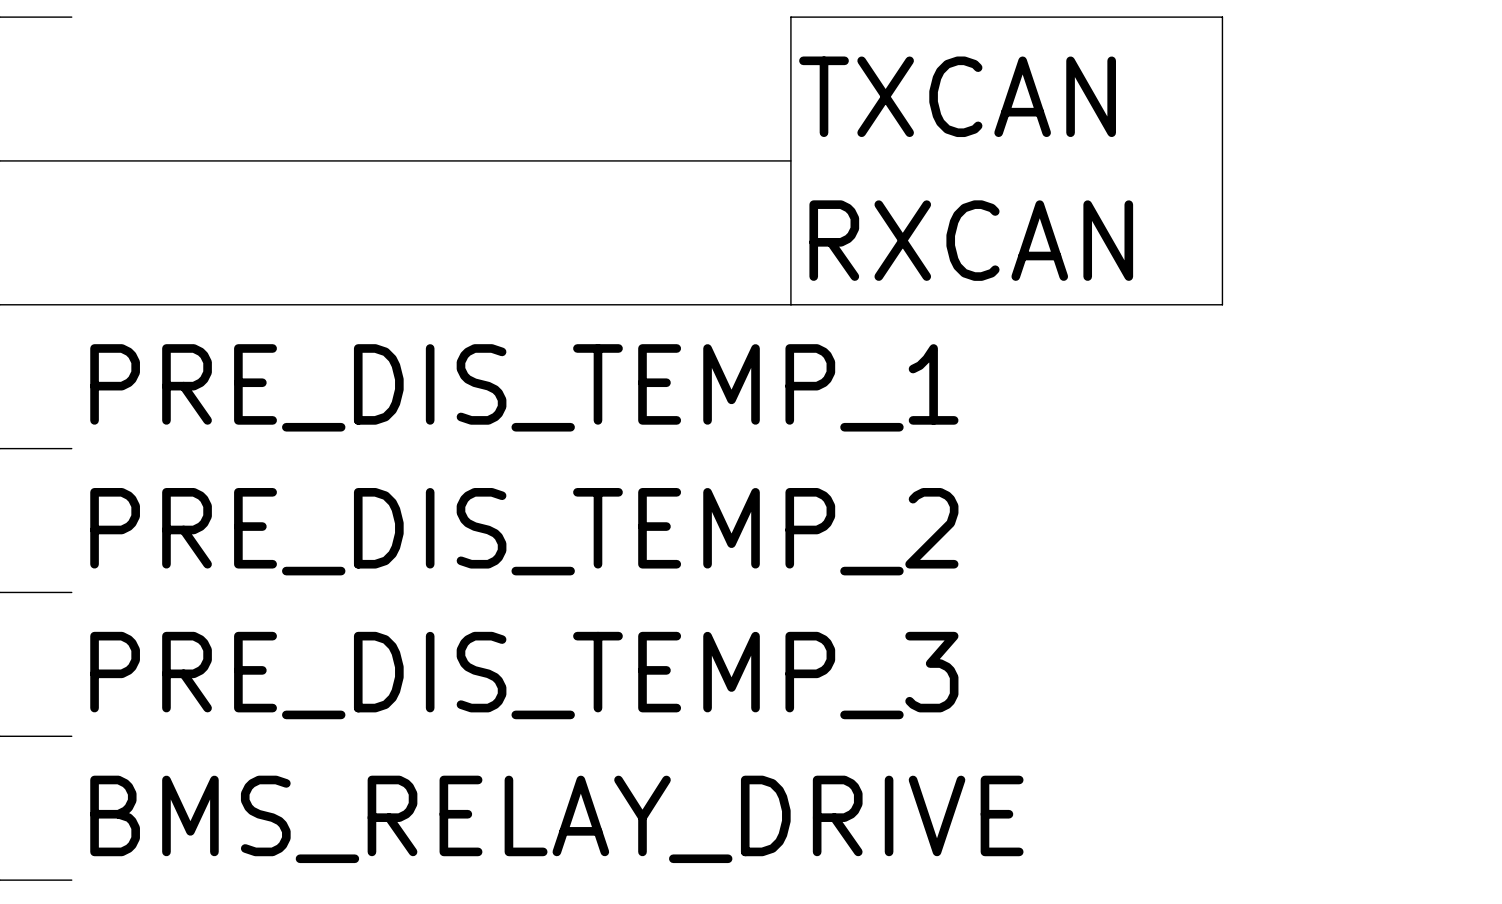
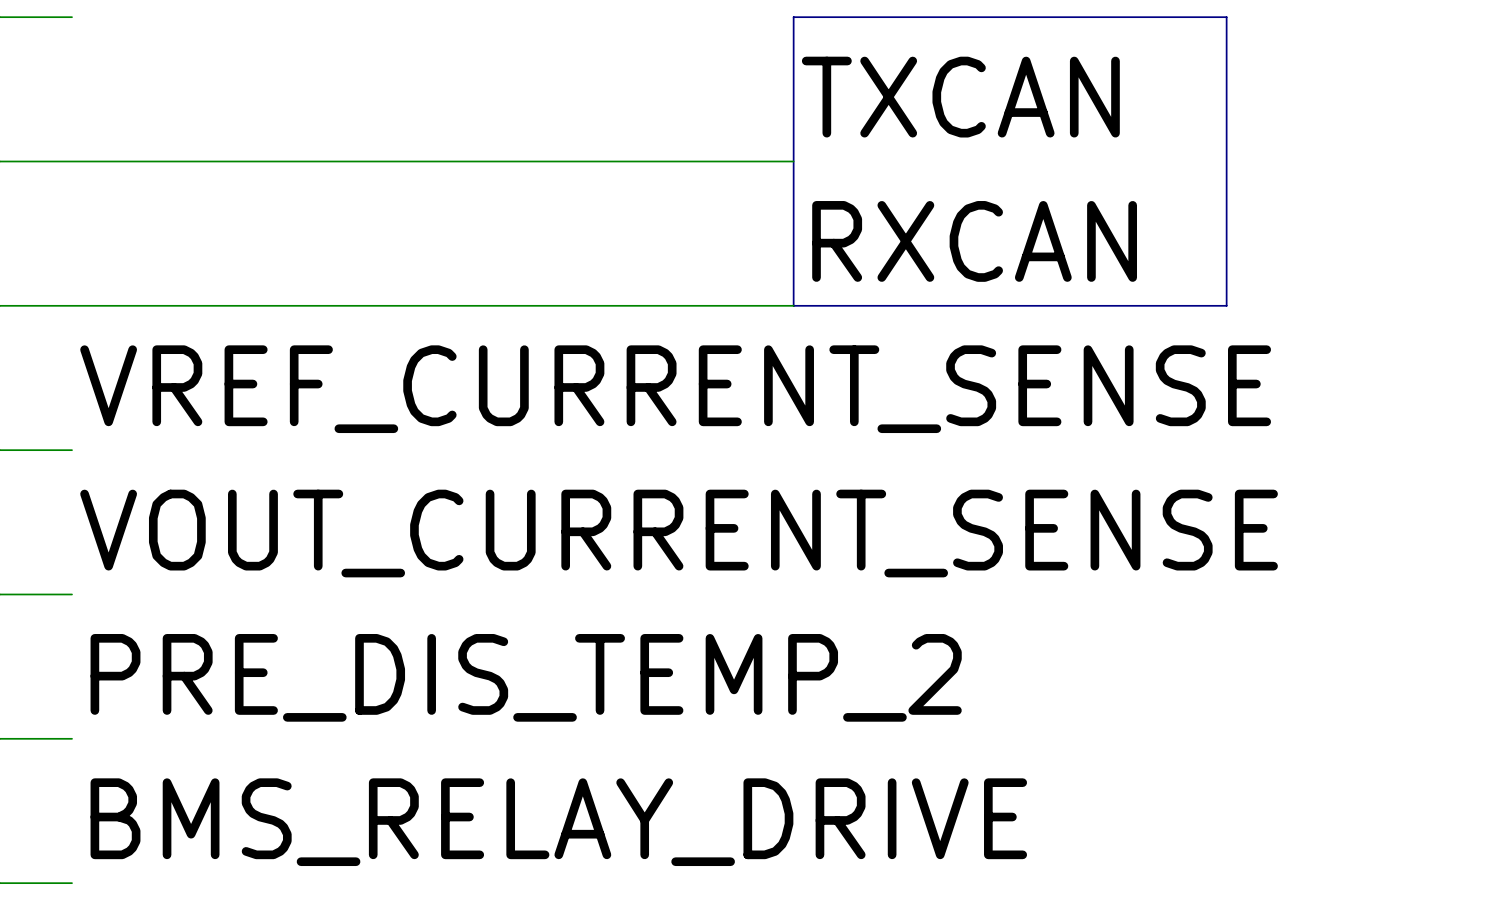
label: PRE_DIS_TEMP_1 (524, 387) -> VREF_CURRENT_SENSE (675, 389)
label: PRE_DIS_TEMP_2 (524, 531) -> VOUT_CURRENT_SENSE (679, 533)
label: PRE_DIS_TEMP_3 (524, 675) -> PRE_DIS_TEMP_2 (526, 677)

